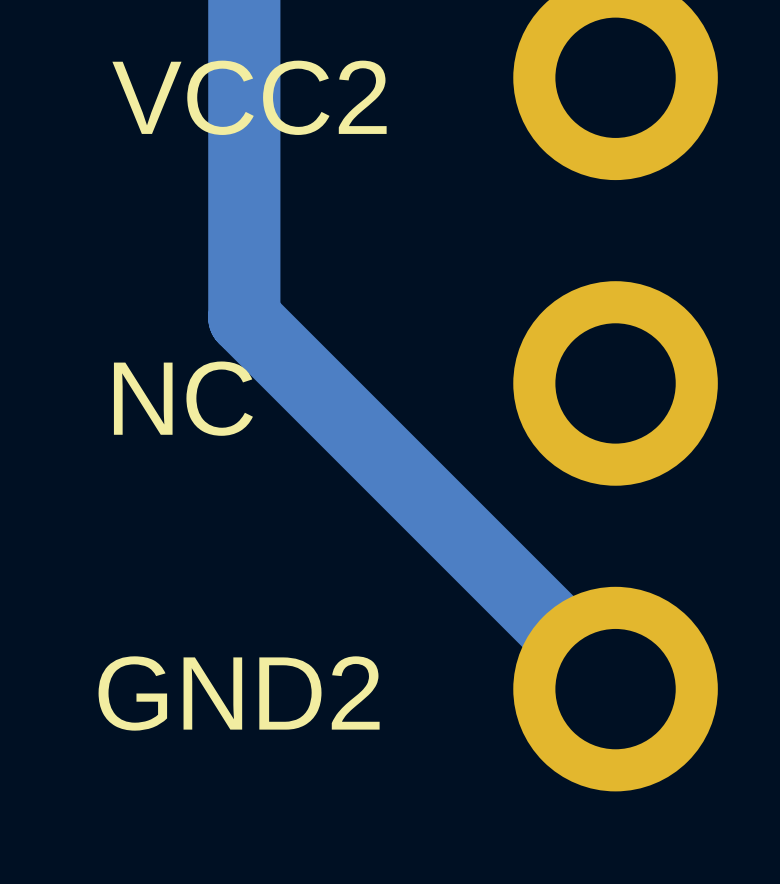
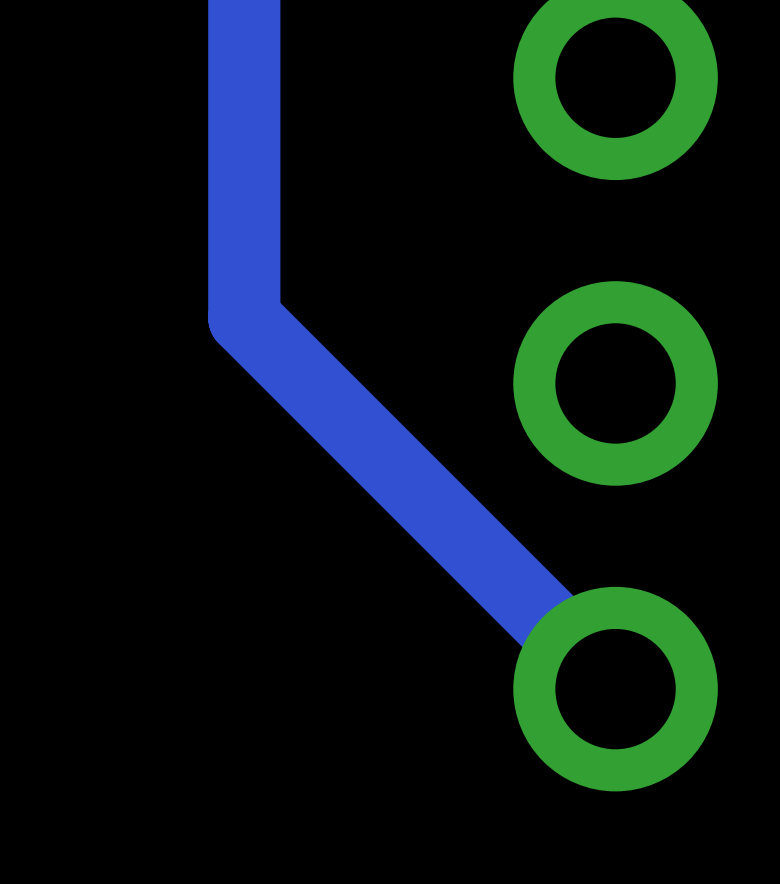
text: VCC2 (249, 97) -> none
text: NC (183, 398) -> none
text: GND2 (239, 693) -> none

